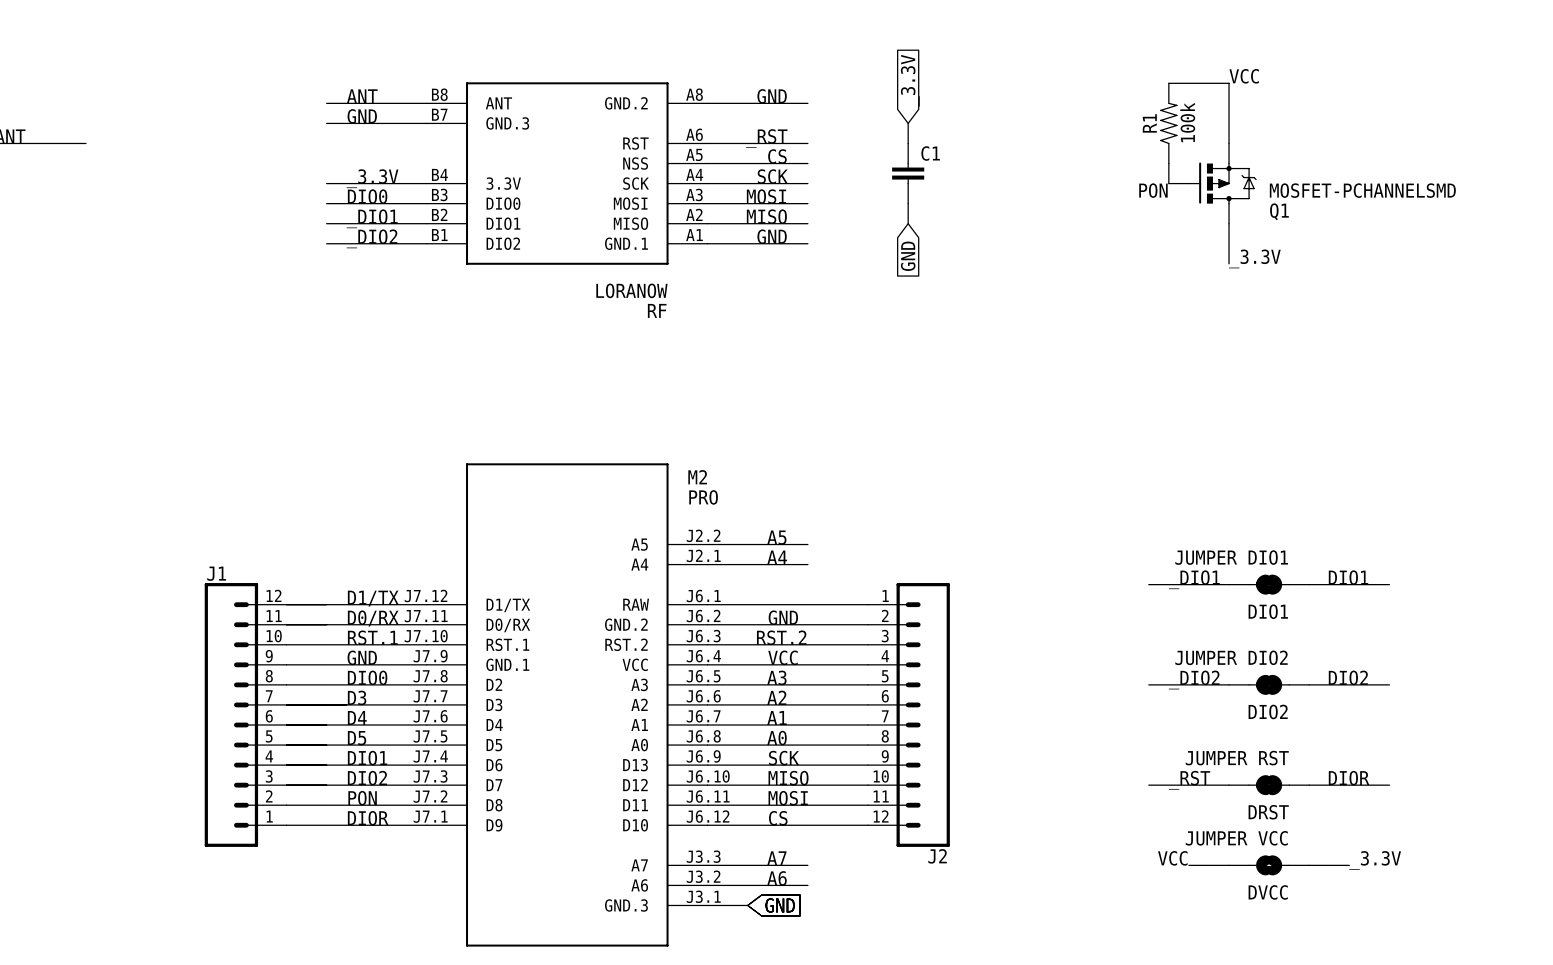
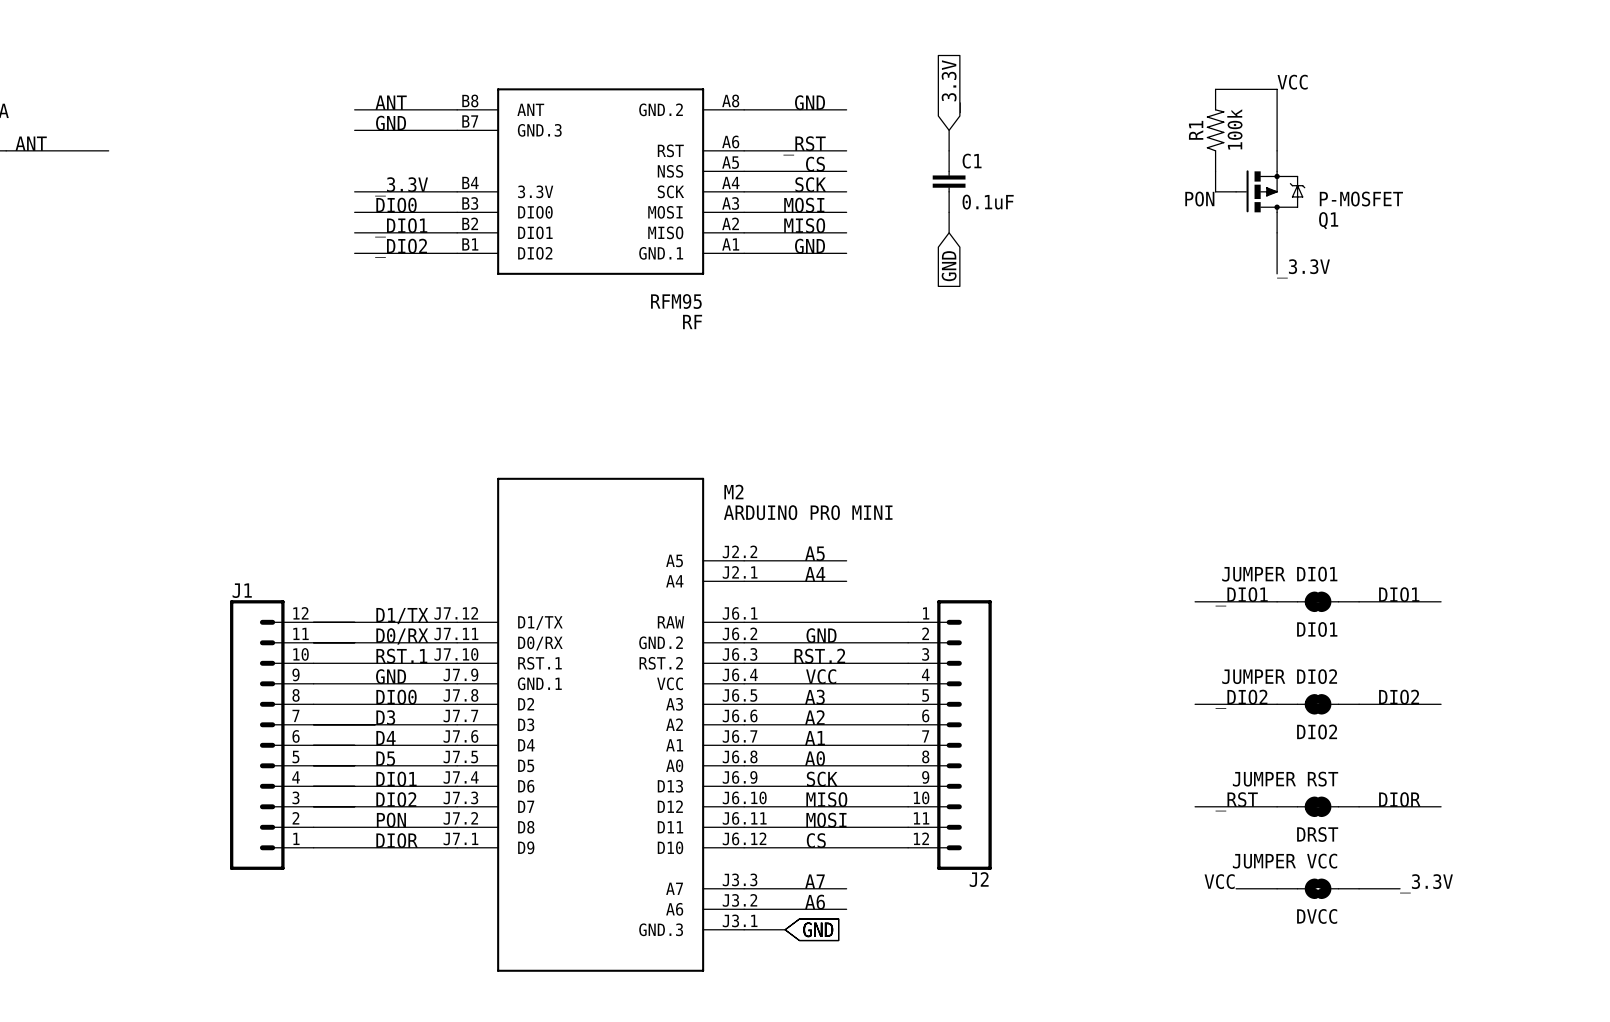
Q1 value: MOSFET-PCHANNELSMD (1362, 190) -> P-MOSFET (1361, 199)
C1 value: none -> 0.1uF (988, 202)
RF value: LORANOW (631, 290) -> RFM95 (676, 301)
M2 value: PRO (703, 497) -> ARDUINO PRO MINI (808, 512)

